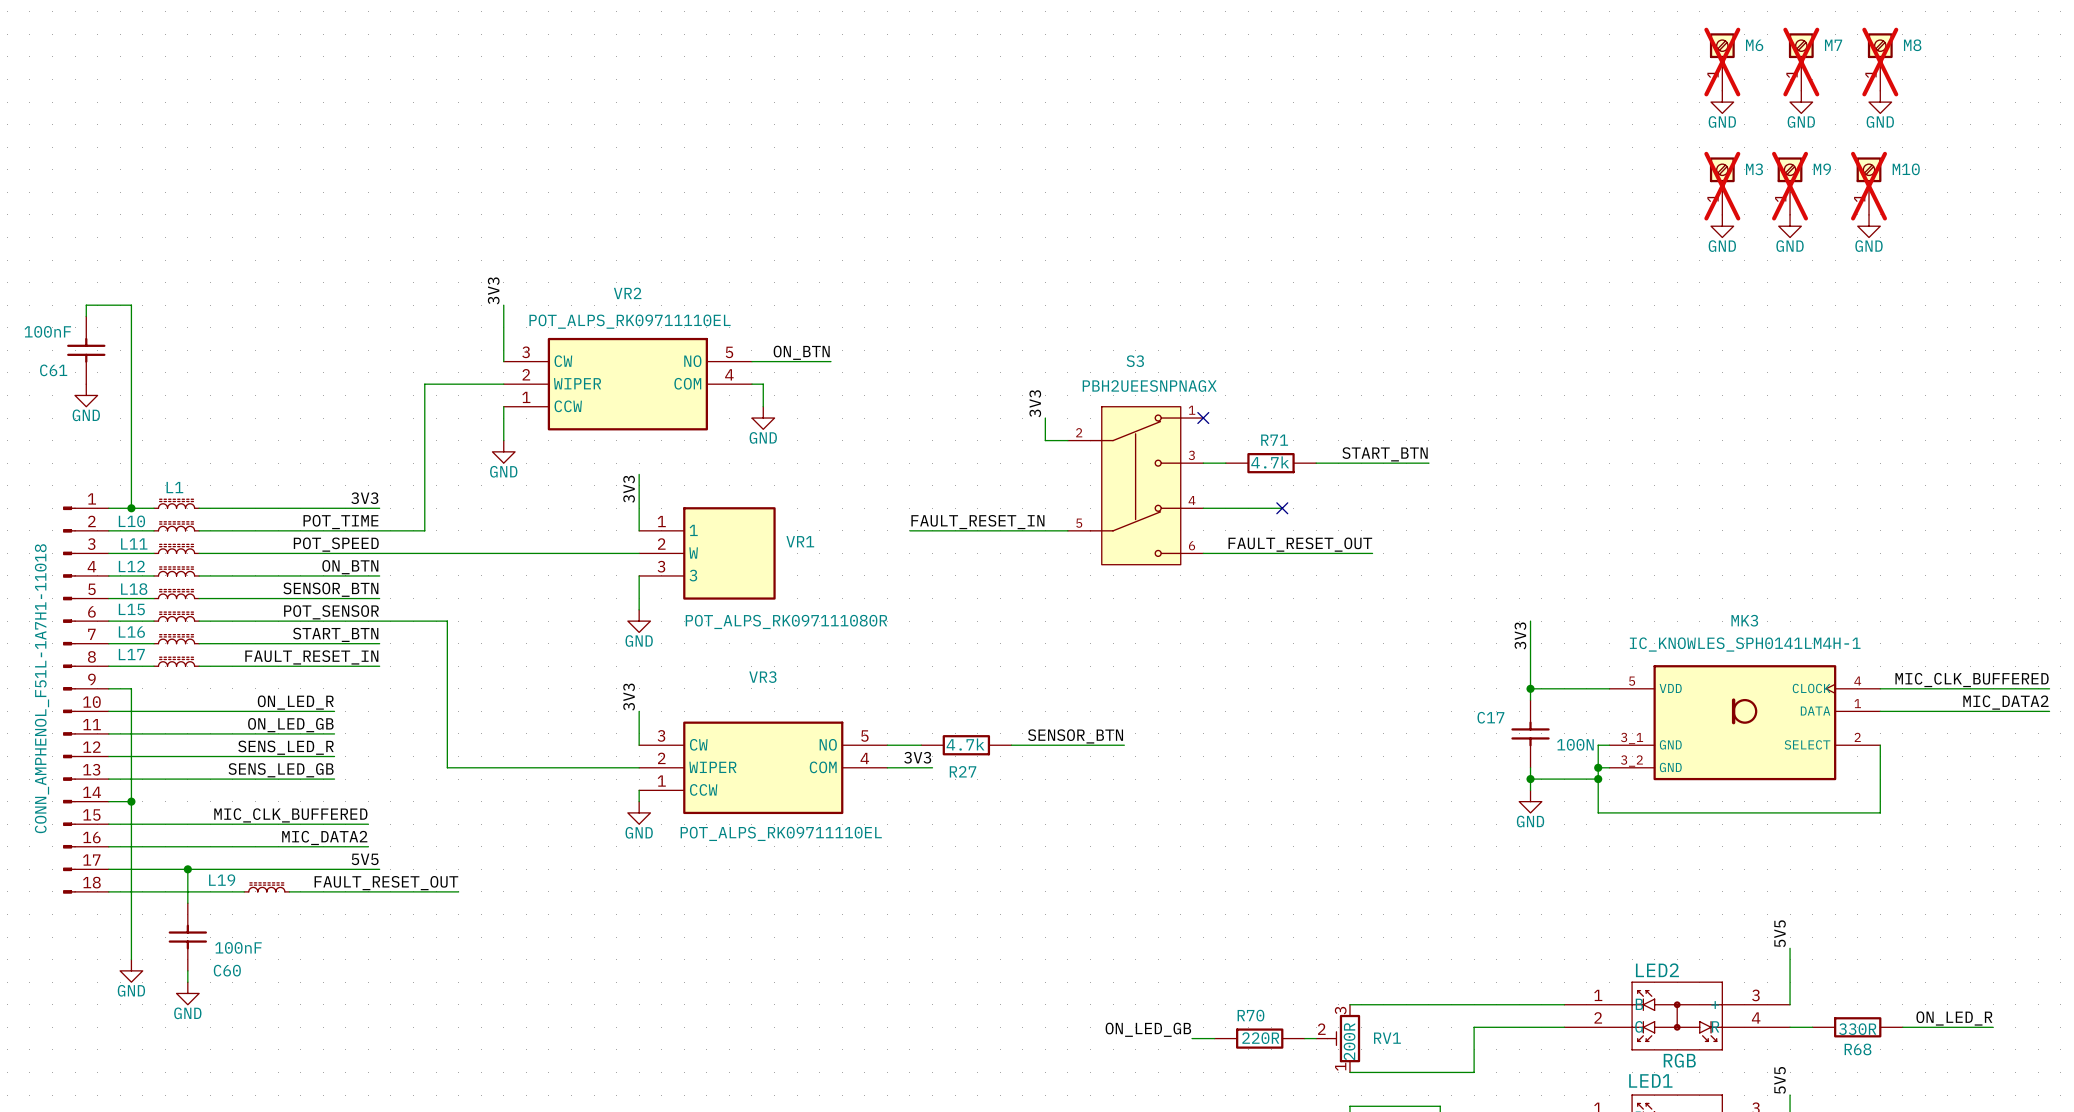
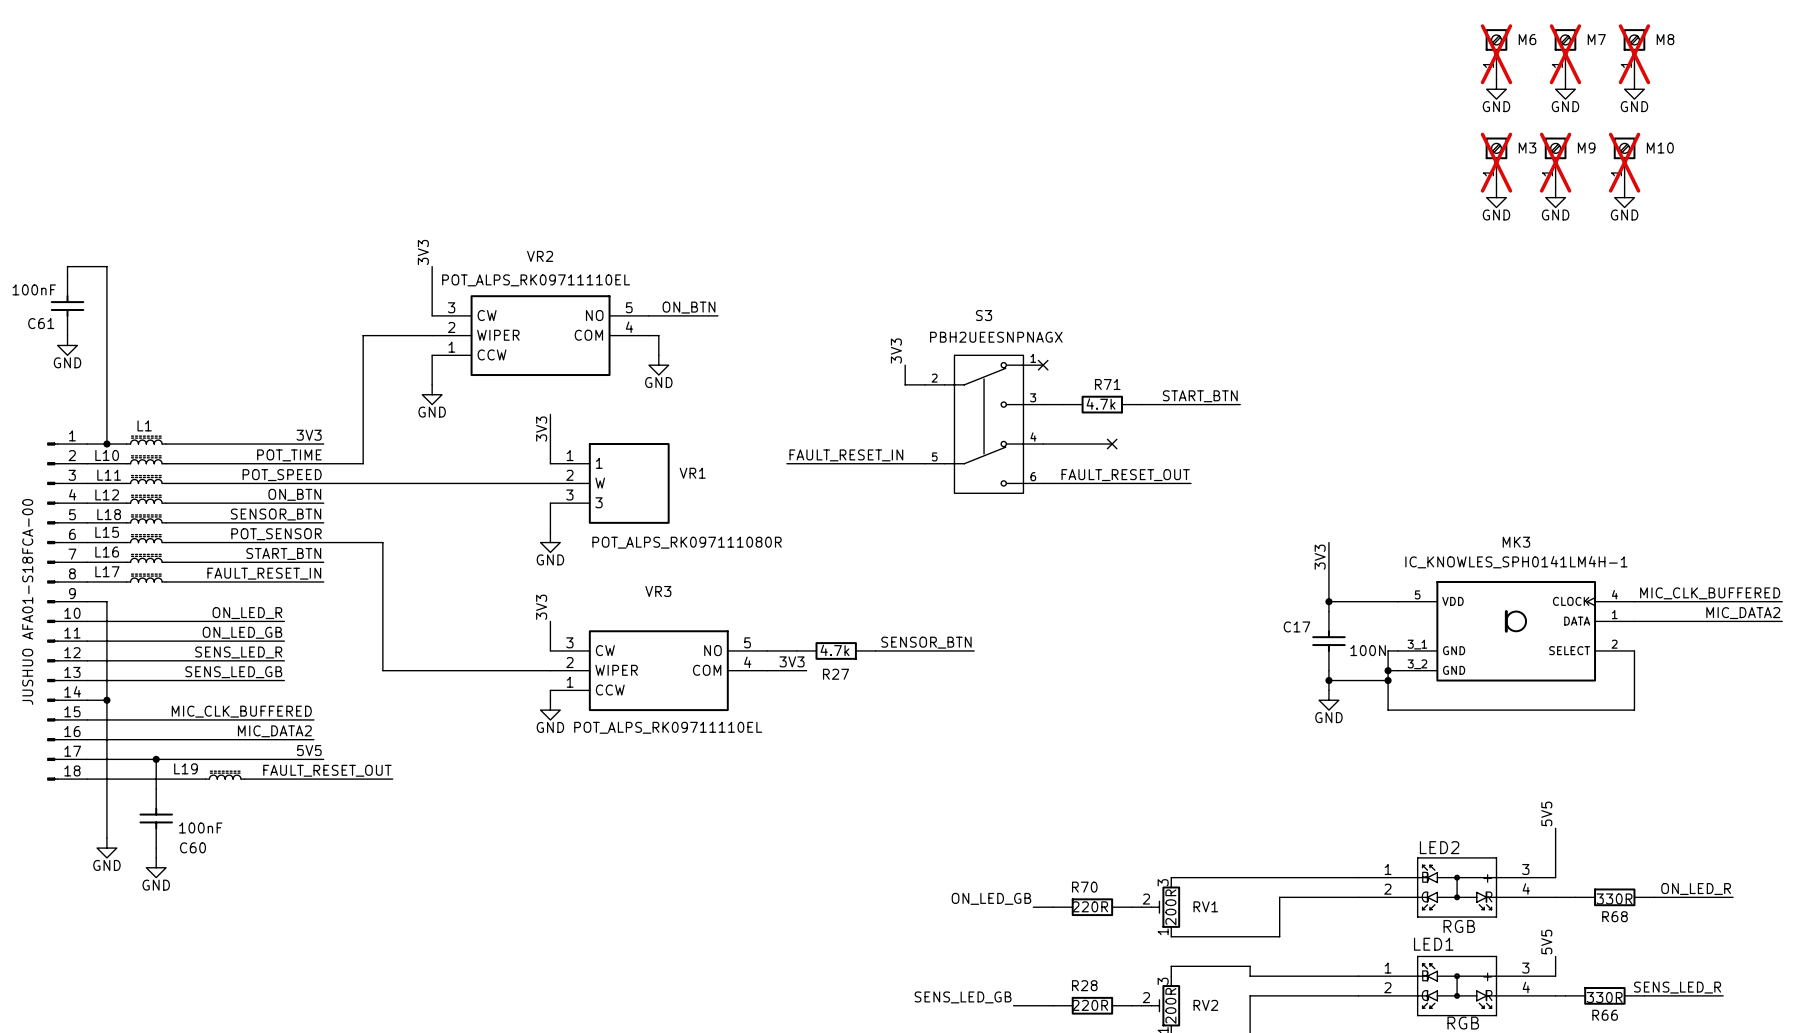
part value: CONN_AMPHENOL_F51L-1A7H1-11018 (42, 688) -> JUSHUO AFA01-S18FCA-00 (27, 601)

